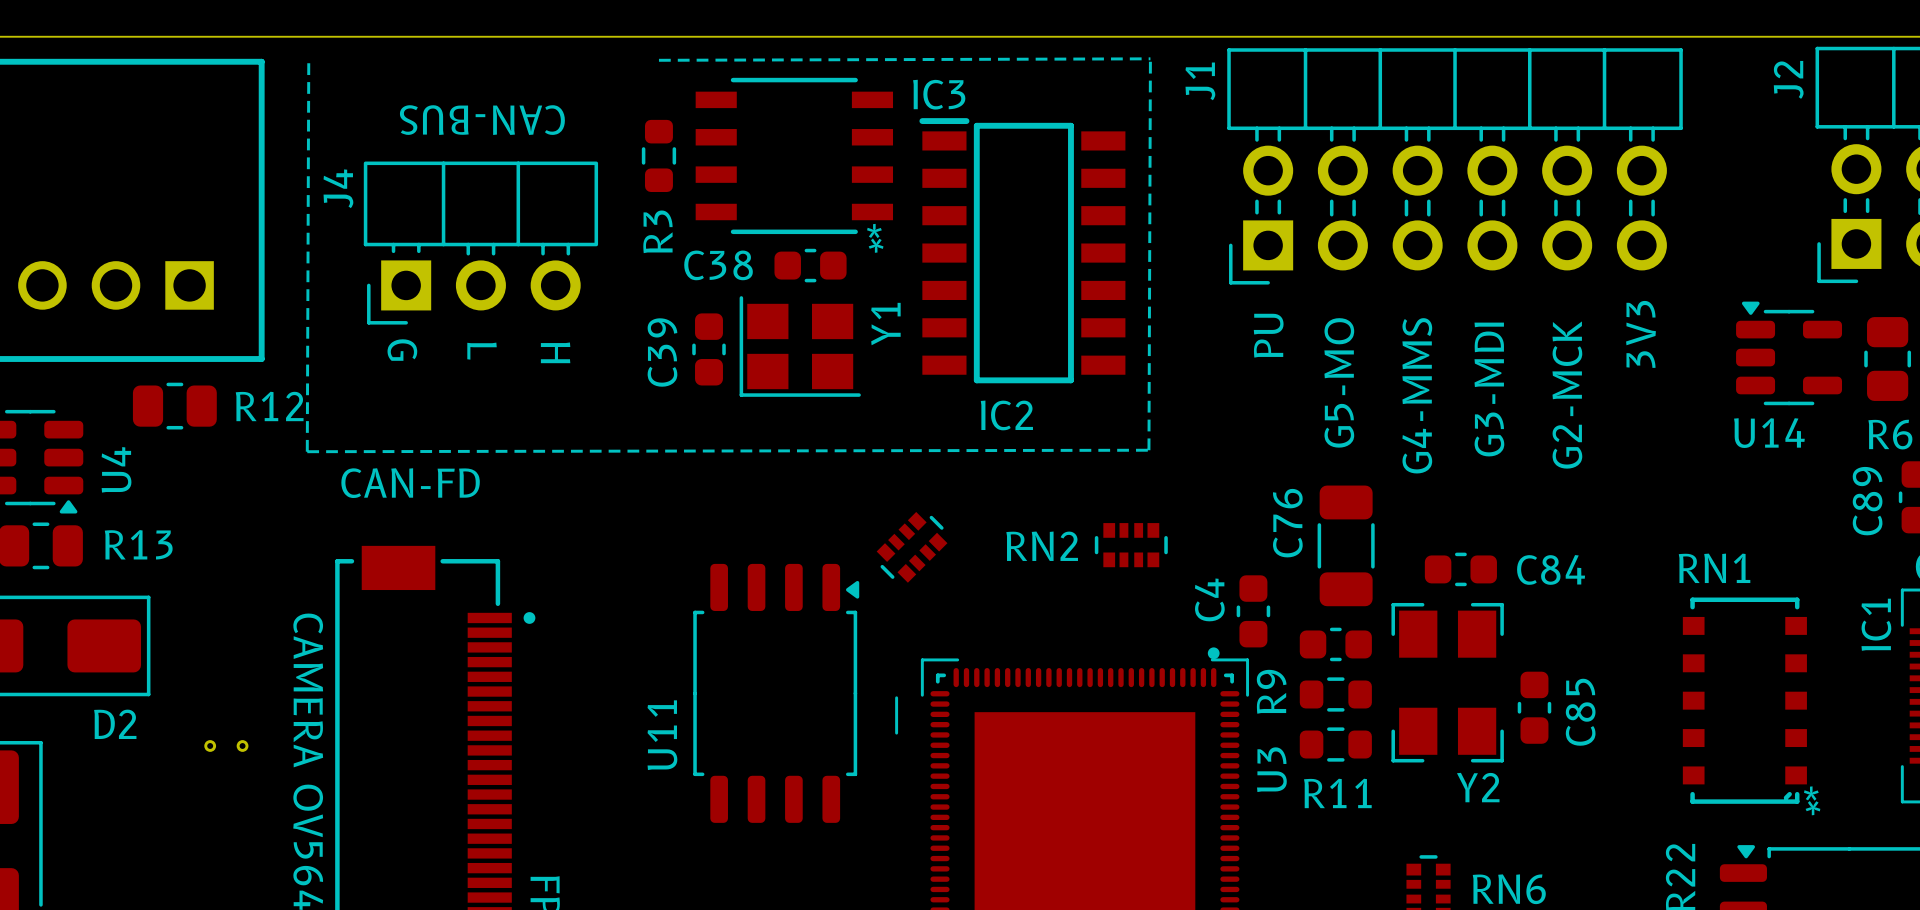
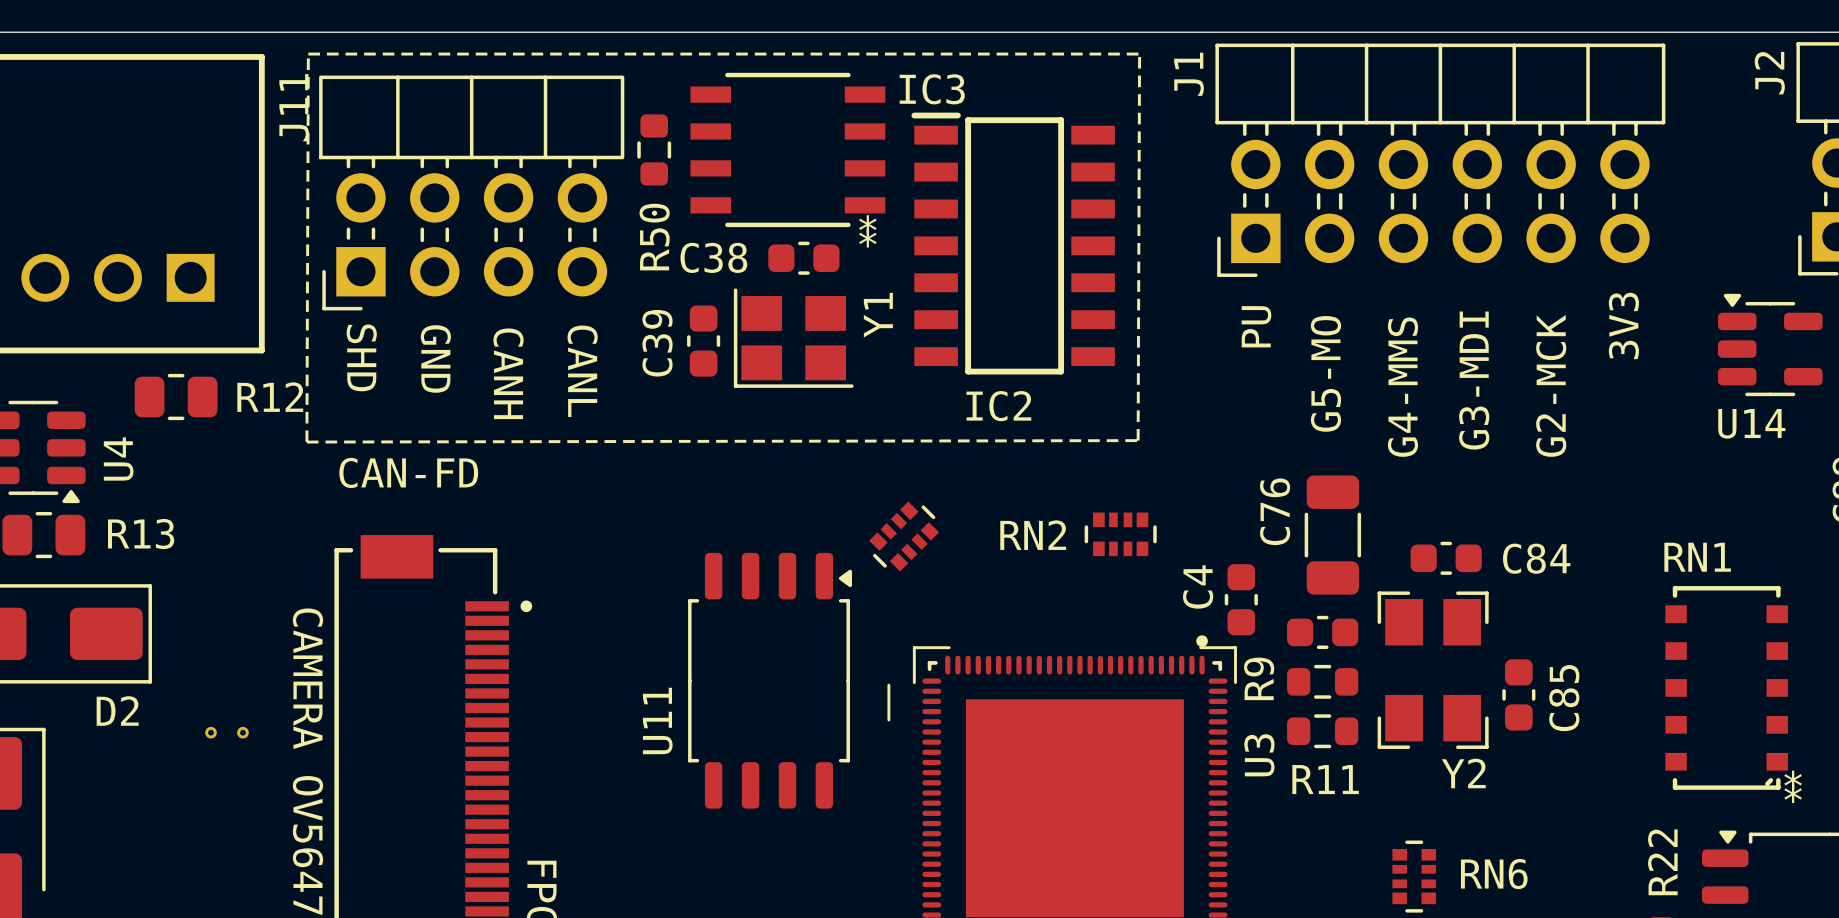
line: (1150, 58) (658, 60) -> (1139, 54) (308, 54)
text: CAN-BUS (482, 120) -> none
J11: none -> (471, 192)
R3 name: R3 (657, 231) -> R50 (654, 237)
J4: (480, 243) -> none
text: G (402, 350) -> none
text: L (482, 351) -> none
text: H (555, 352) -> none
text: none -> SHD (361, 357)
text: none -> GND (435, 358)
text: none -> CANL (582, 371)
text: none -> CANH (508, 373)

